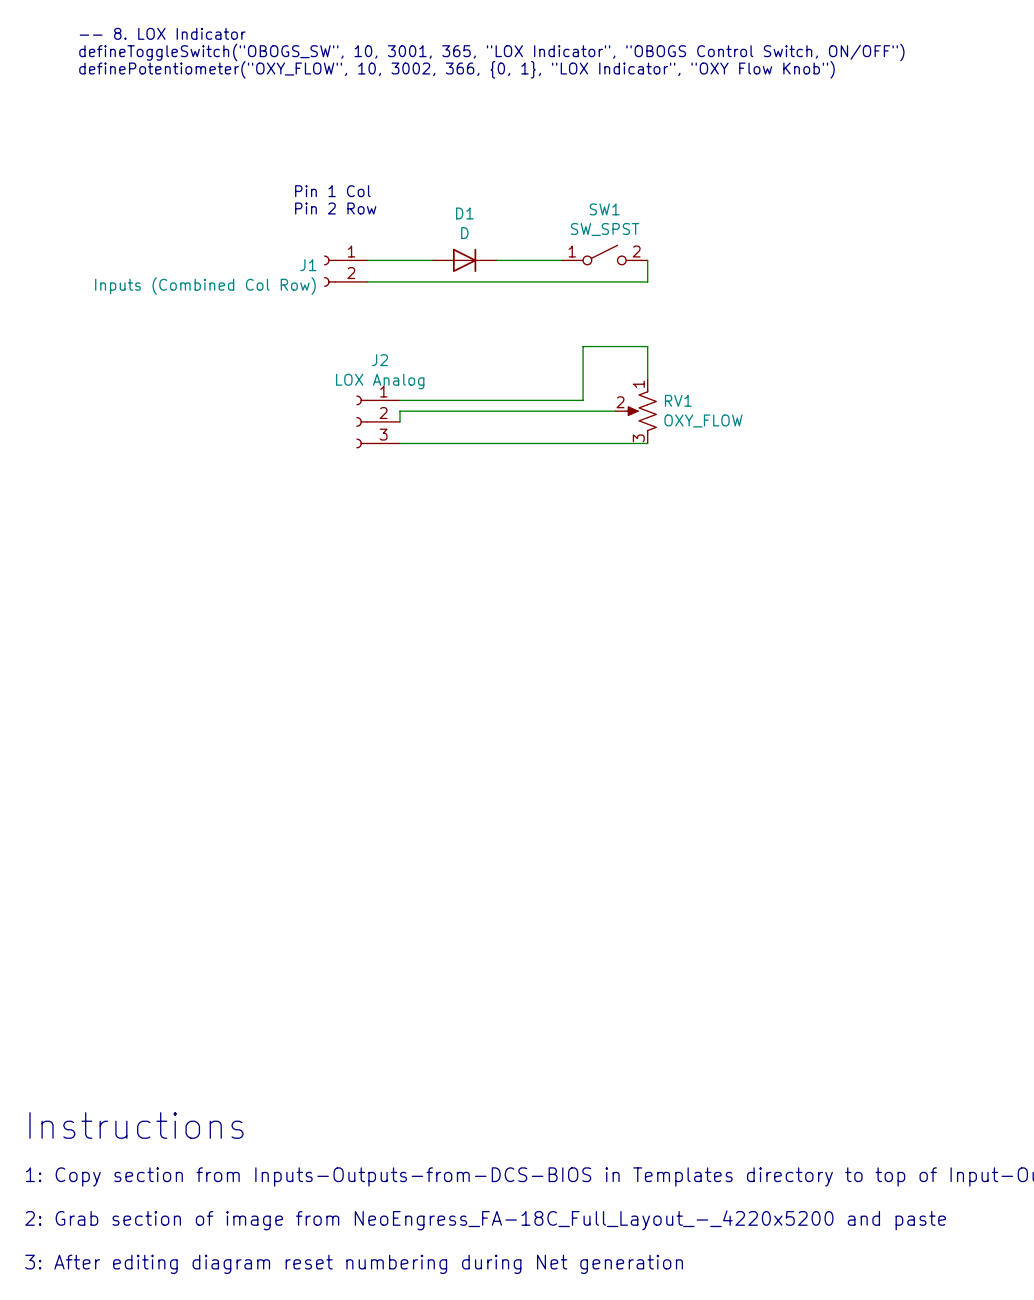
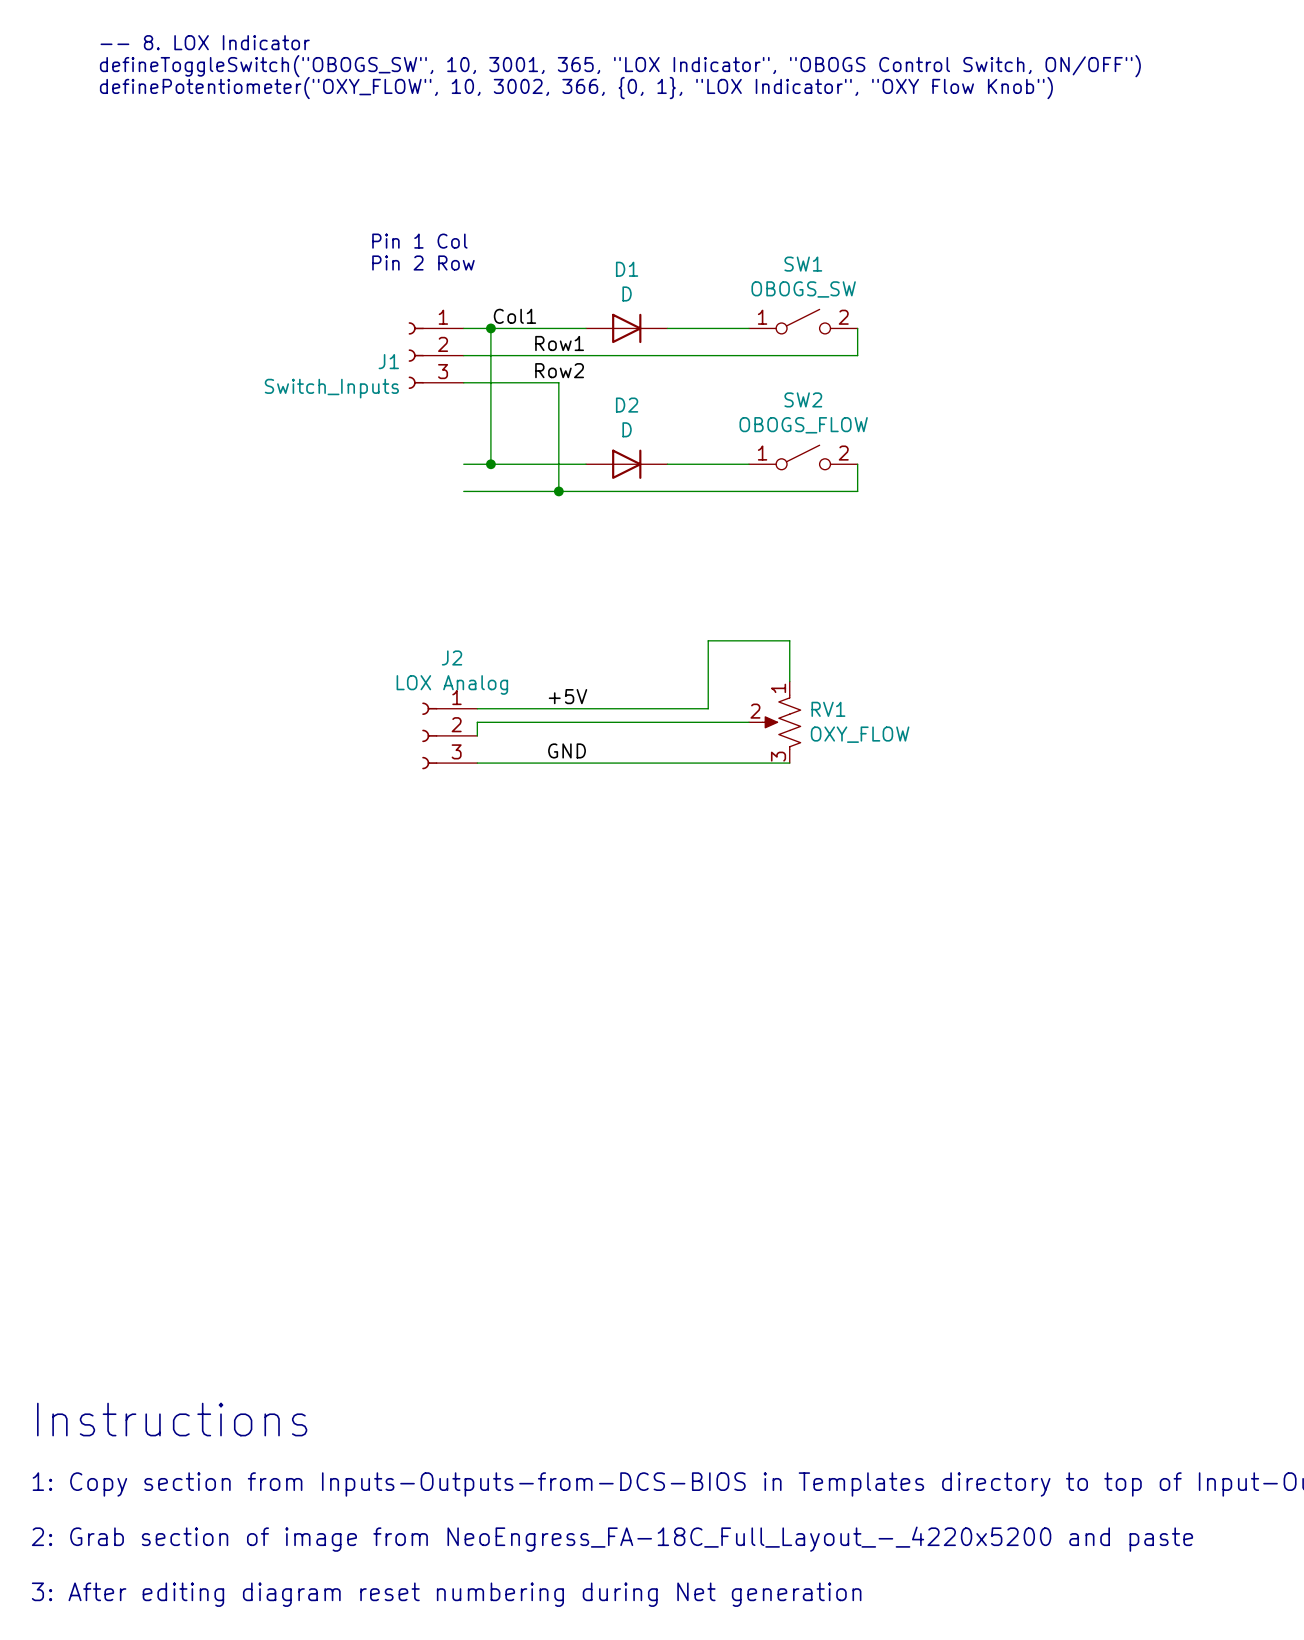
SW1 value: SW_SPST (605, 229) -> OBOGS_SW (803, 289)
label: none -> Col1 (514, 316)
J1 symbol: [323, 255, 368, 287] -> [408, 322, 464, 390]
SW1 position: (604, 255) -> (803, 321)
wire: none -> (490, 328) (490, 464)
junction: none -> (490, 328)
D1 position: (464, 260) -> (626, 328)
wire: (647, 260) (647, 281) -> (857, 328) (857, 355) (816, 355)
label: none -> Row1 (559, 343)
J1 value: Inputs (Combined Col Row) (205, 286) -> Switch_Inputs (331, 388)
label: none -> Row2 (559, 370)
wire: none -> (463, 382) (558, 382) (558, 491)
SW2: none -> OBOGS_FLOW (803, 457)
wire: none -> (463, 464) (586, 464)
junction: none -> (490, 464)
D2: none -> D (626, 464)
wire: none -> (667, 464) (748, 464)
wire: none -> (857, 464) (857, 491) (463, 491)
wire: (647, 378) (647, 346) (583, 346) (583, 400) (400, 400) -> (789, 681) (789, 640) (708, 640) (708, 708) (477, 708)
junction: none -> (558, 491)
wire: (615, 411) (400, 411) (400, 421) -> (748, 722) (477, 722) (477, 735)
RV1 position: (635, 411) -> (774, 722)
J2 position: (378, 421) -> (449, 735)
wire: (400, 443) (647, 443) -> (477, 763) (789, 763)
label: none -> +5V (567, 696)
label: none -> GND (567, 750)

